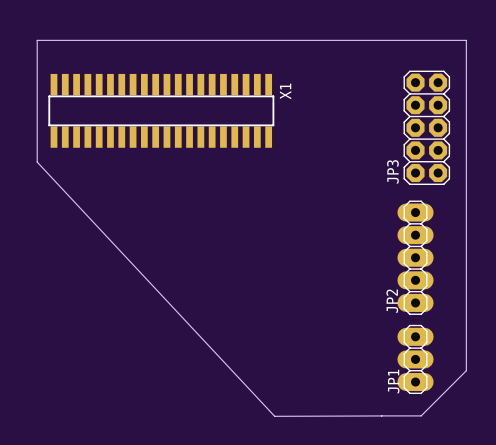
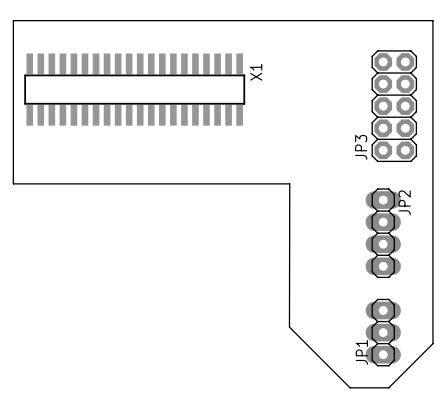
board edge: (37, 162) (274, 416) (381, 415) -> (13, 139) (13, 183) (289, 183) (289, 327) (350, 387)
JP2 footprint: [397, 200, 434, 315] -> [365, 188, 401, 279]
JP2 name position: JP2 (392, 301) -> JP2 (404, 202)

